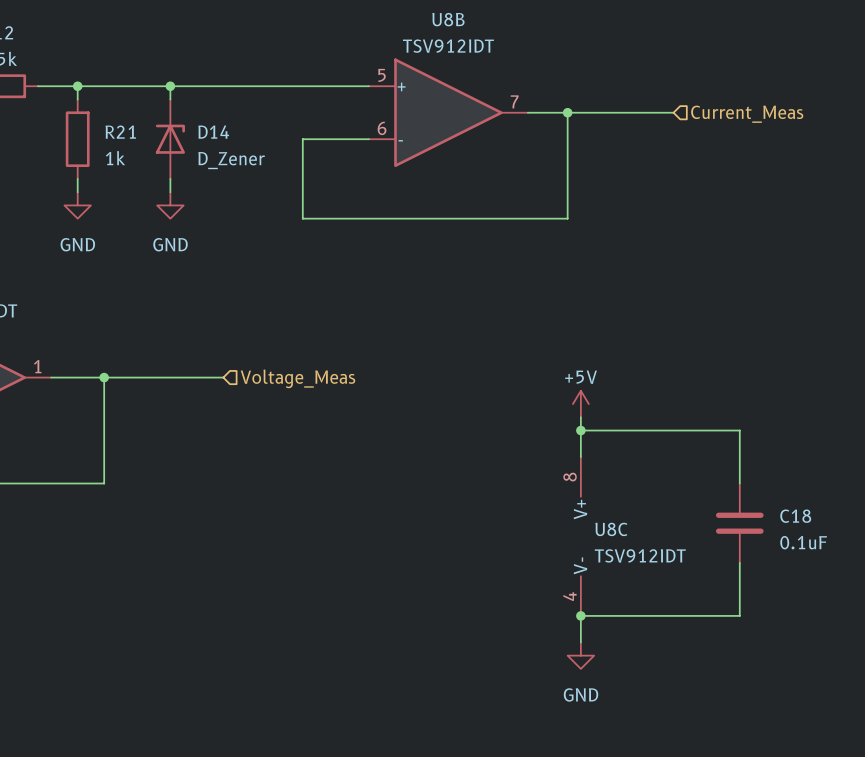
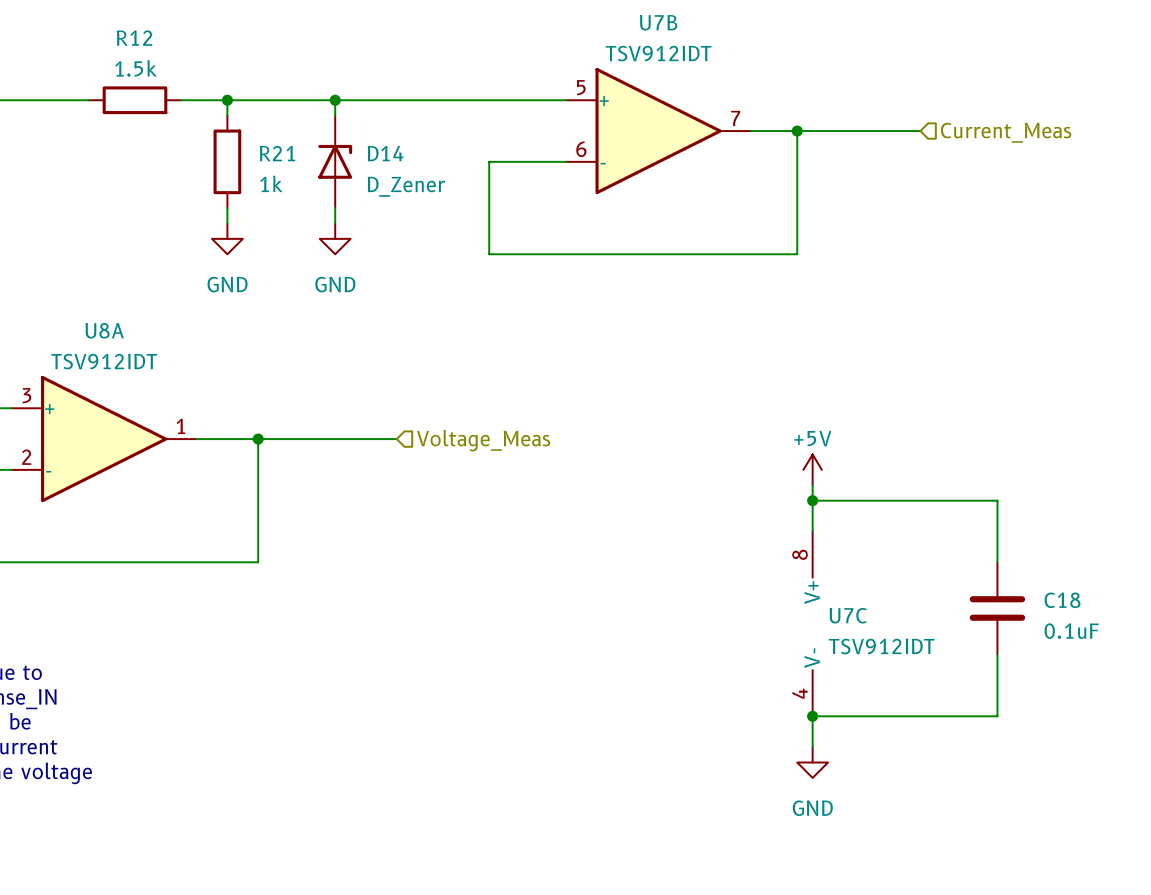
U8B name: U8B (448, 19) -> U7B (658, 22)
U8C name: U8C (611, 529) -> U7C (848, 615)

